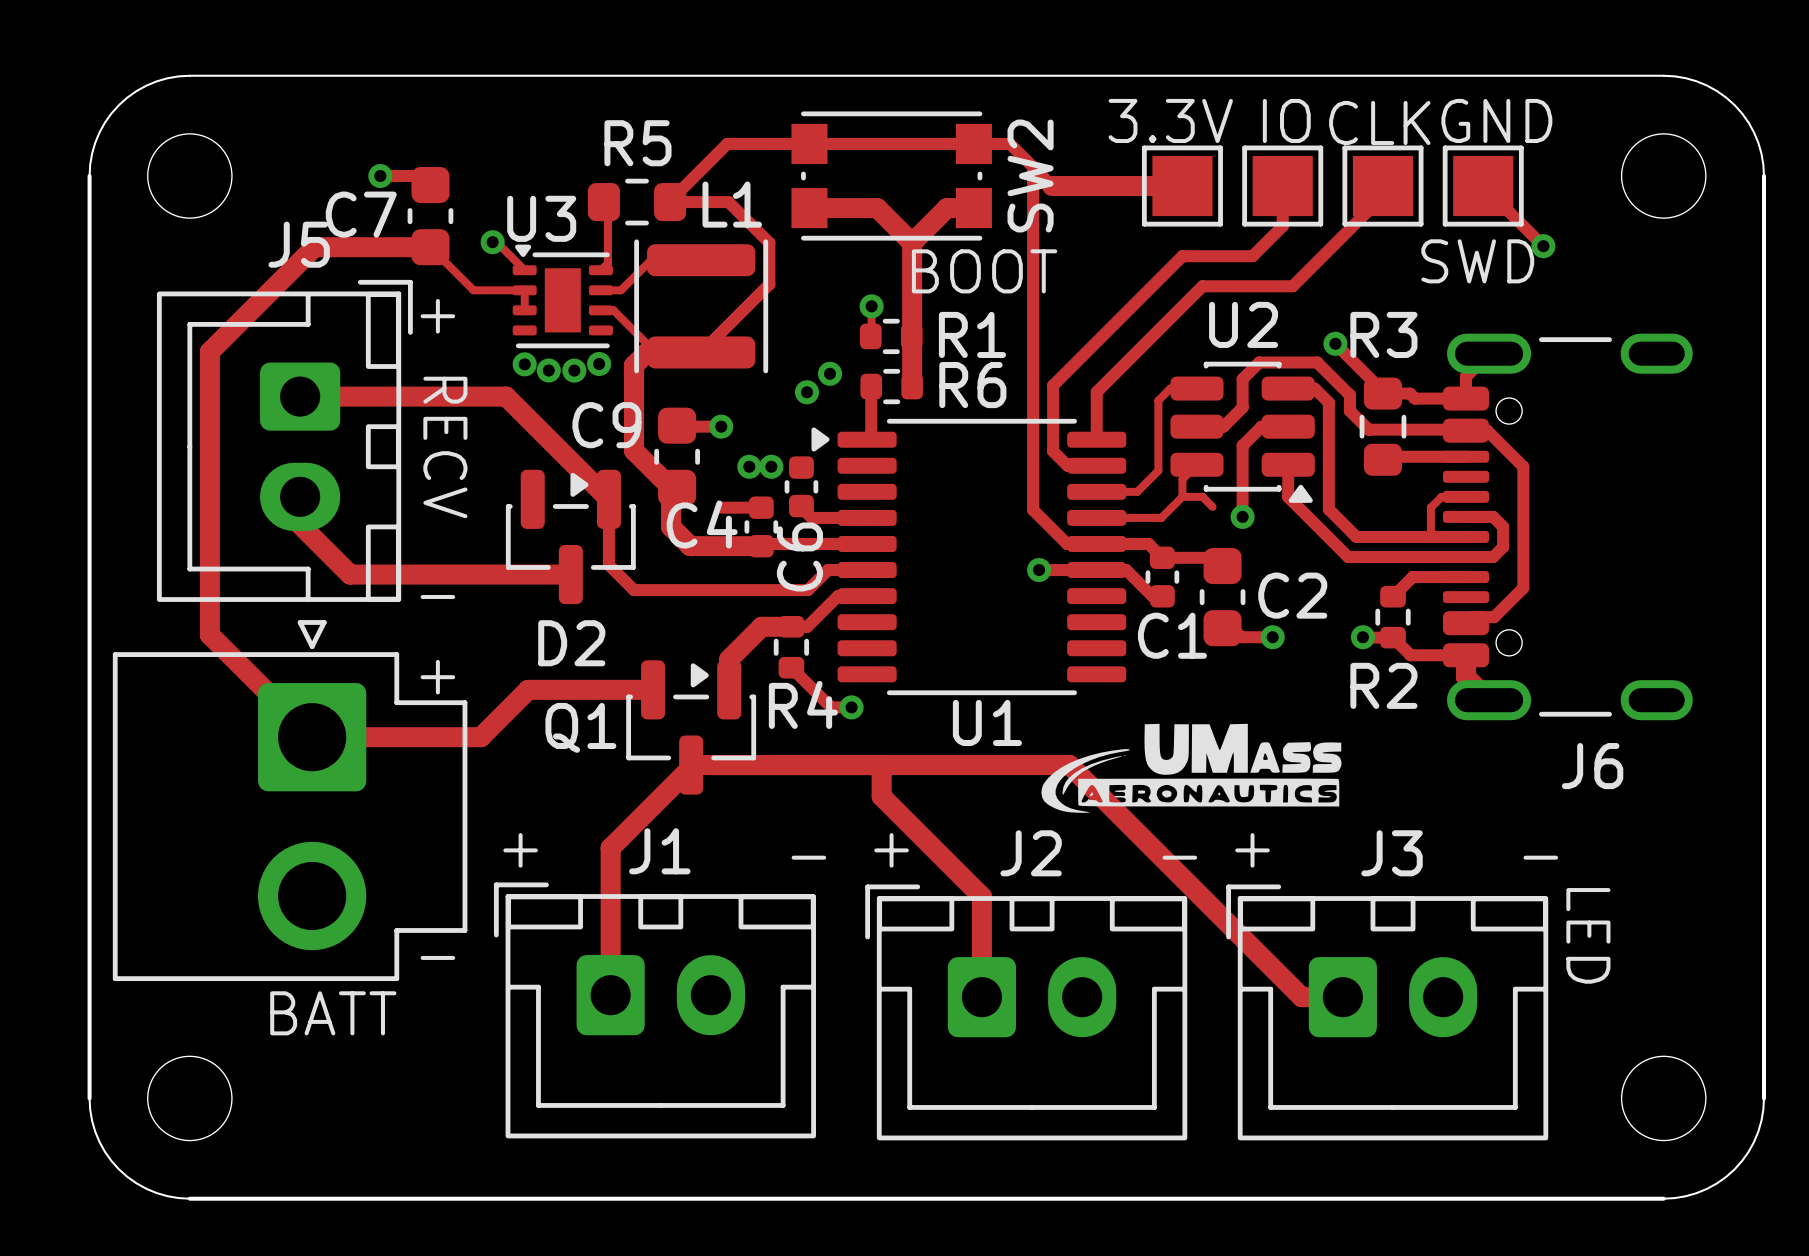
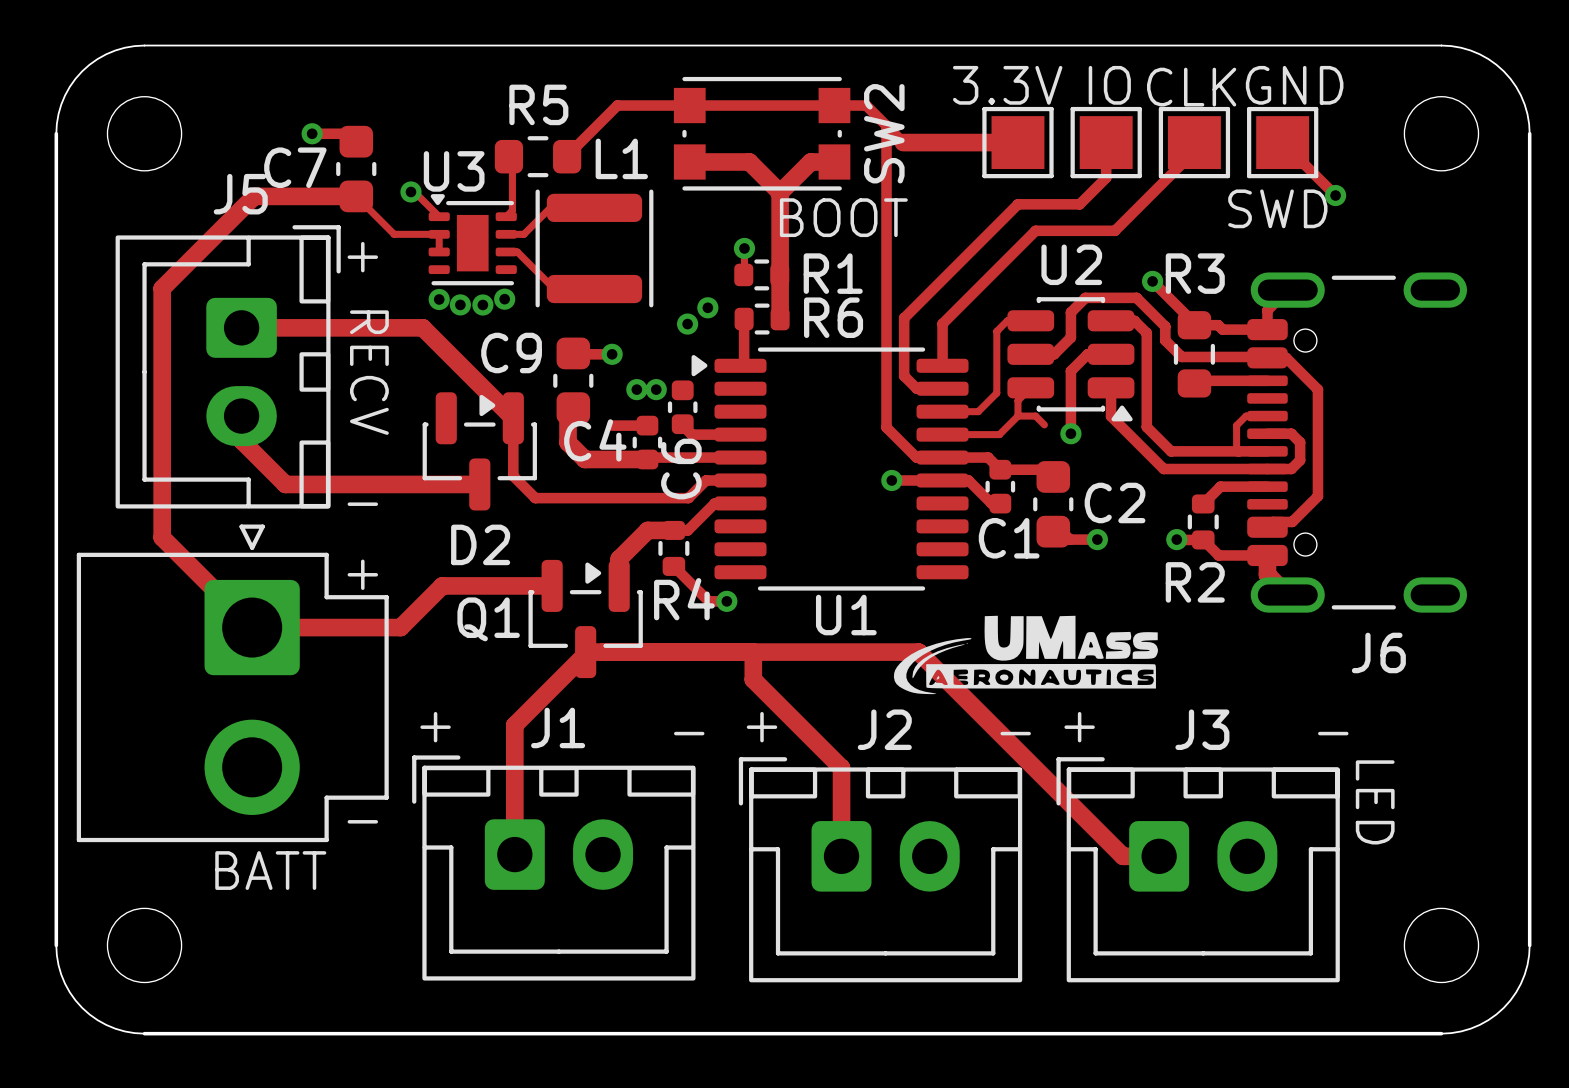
top track: (670, 202) (728, 202) (769, 242) (769, 284) (701, 352) (647, 352) (634, 365) (634, 450) (671, 487) -> none

